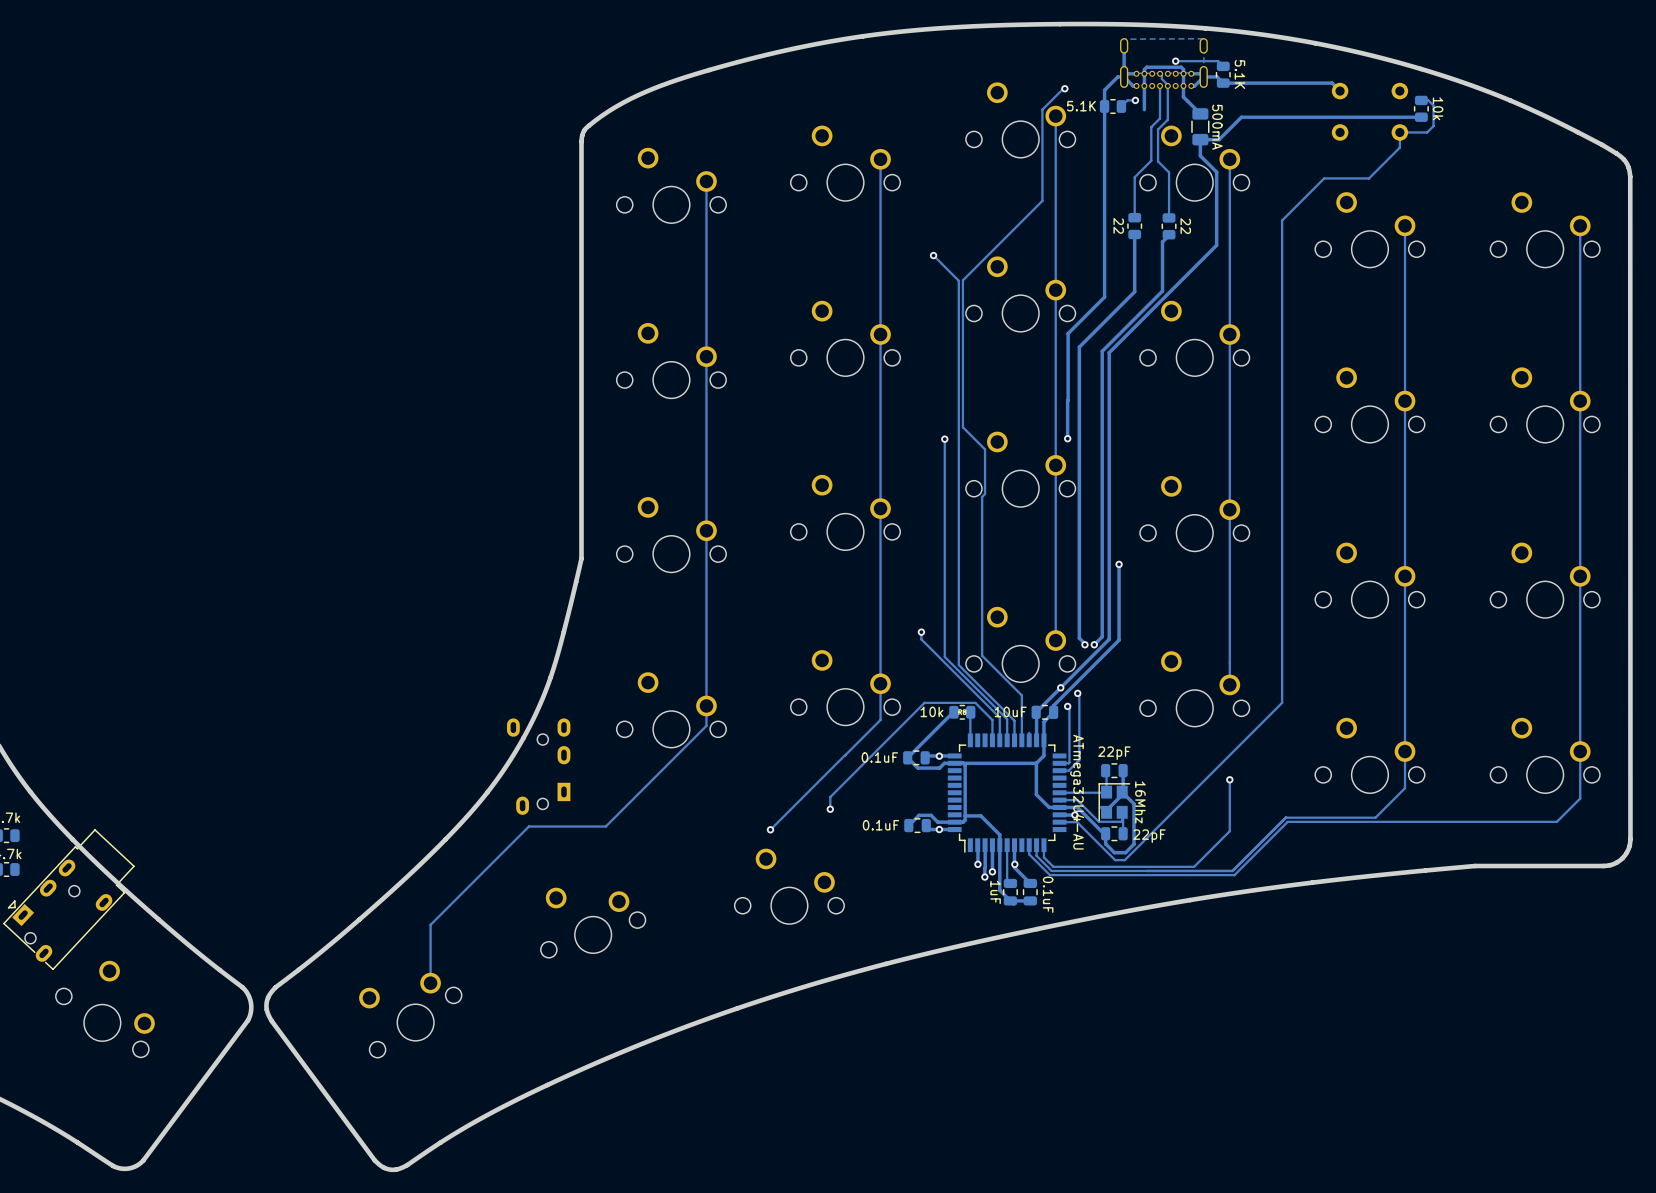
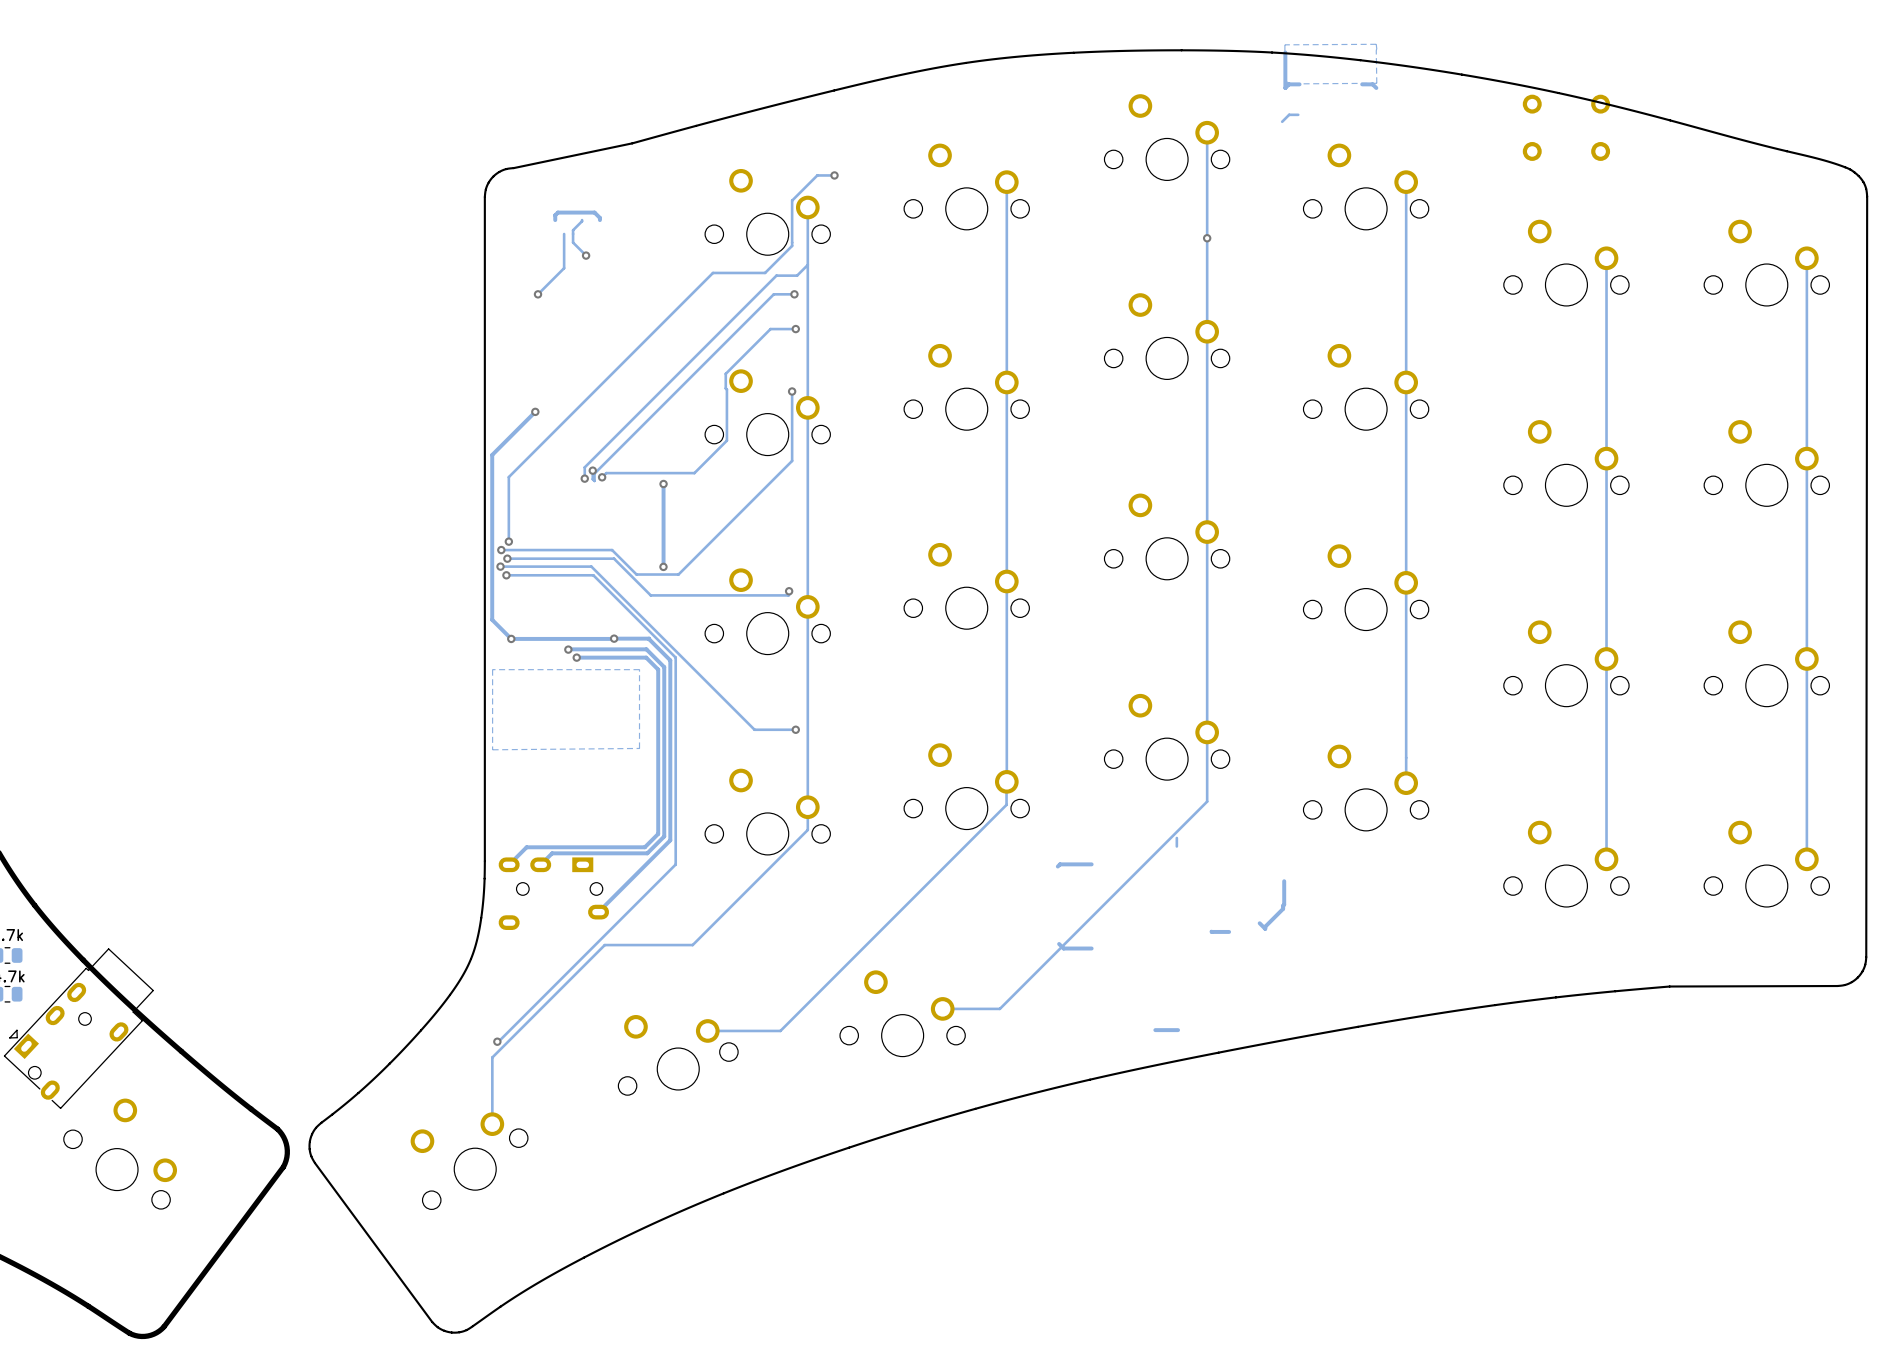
board edge: (1059, 24) (985, 25) (912, 30) (853, 37) (786, 50) (709, 70) (653, 88) (616, 106) (584, 130) (581, 141) (581, 558) (560, 643) (547, 685) (533, 719) (515, 752) (495, 782) (469, 813) (435, 849) (387, 895) (325, 948) (275, 987) (266, 1002) (267, 1011) (271, 1021) (374, 1160) (383, 1167) (393, 1169) (403, 1167) (453, 1134) (499, 1108) (570, 1074) (641, 1044) (764, 999) (895, 961) (1075, 921) (1235, 892) (1347, 878) (1475, 866) (1606, 865) (1618, 861) (1626, 852) (1630, 839) (1630, 176) (1625, 161) (1602, 144) (1510, 100) (1443, 76) (1368, 54) (1294, 39) (1226, 30) (1150, 25) (1059, 24) -> (1181, 50) (1260, 51) (1332, 57) (1417, 67) (1510, 83) (1614, 106) (1823, 160) (1849, 169) (1861, 179) (1867, 196) (1866, 957) (1862, 971) (1852, 981) (1839, 985) (1669, 986) (1563, 996) (1469, 1008) (1236, 1049) (1039, 1091) (880, 1137) (731, 1190) (653, 1223) (578, 1260) (520, 1293) (466, 1330) (453, 1332) (440, 1328) (432, 1322) (314, 1163) (310, 1154) (309, 1144) (311, 1135) (316, 1126) (382, 1071) (441, 1006) (467, 966) (479, 928) (484, 869) (484, 197) (488, 182) (496, 174) (506, 169) (632, 143) (799, 99) (924, 70) (979, 61) (1039, 54) (1181, 50)
track: (1175, 61) (1218, 61) (1223, 66) -> none
via: (1175, 61) -> none
part: (1163, 63) -> none
track: (1160, 73) (1161, 79) (1167, 84) (1167, 119) (1158, 129) (1158, 161) (1169, 172) (1169, 217) -> none
part: 5.1K (1223, 74) -> none
track: (1136, 85) (1133, 85) (1124, 76) (1117, 76) (1104, 90) (1104, 297) (1068, 333) (1067, 438) -> none
track: (1160, 85) (1160, 118) (1151, 127) (1151, 160) (1134, 177) (1134, 217) -> none
track: (1191, 85) (1194, 85) (1203, 76) (1217, 76) (1223, 83) (1332, 83) (1340, 91) -> none
track: (1064, 88) (1042, 109) (1042, 200) (962, 280) (962, 427) (985, 449) (985, 494) (982, 496) (982, 655) (1021, 695) (1021, 740) -> none
via: (1064, 88) -> none
via: (1135, 100) -> none
track: (1421, 100) (1428, 100) (1433, 105) (1433, 126) (1427, 132) (1399, 132) (1399, 147) (1369, 178) (1324, 178) (1282, 220) (1282, 702) (1124, 860) (1115, 860) (1077, 822) (1059, 822) -> none
part: 5.1K (1112, 106) -> none
part: 10k (1421, 108) -> none
track: (1144, 109) (1144, 69) (1146, 67) (1181, 67) (1183, 69) (1183, 97) (1200, 113) -> none
track: (1421, 117) (1241, 117) (1219, 139) (1200, 139) (1200, 155) (1216, 172) (1216, 245) (1109, 352) (1109, 639) (1036, 712) -> none
part: 500mA (1200, 126) -> none
track: none -> (834, 175) (817, 175) (792, 200) (792, 245) (765, 272) (712, 272) (508, 477) (508, 541)
via: none -> (834, 175)
track: none -> (582, 220) (573, 230) (573, 242) (586, 255)
track: none -> (599, 220) (594, 212) (557, 212) (555, 215) (555, 220)
track: none -> (564, 234) (564, 268) (538, 294)
via: none -> (1207, 238)
via: none -> (586, 255)
part: 22 (1134, 226) -> none
part: 22 (1169, 226) -> none
track: none -> (807, 264) (797, 275) (776, 275) (584, 467) (584, 478)
track: (1134, 234) (1134, 291) (1079, 347) (1079, 638) (1083, 642) -> none
track: (1169, 234) (1162, 241) (1162, 291) (1102, 351) (1102, 636) (1094, 644) -> none
track: (933, 255) (958, 280) (958, 665) (1014, 720) (1014, 740) -> none
via: (933, 255) -> none
via: none -> (538, 294)
track: none -> (794, 294) (773, 294) (594, 473) (594, 480) (592, 470)
via: none -> (794, 294)
track: none -> (795, 329) (770, 329) (725, 373) (726, 440) (694, 473) (606, 473) (602, 477)
via: none -> (795, 329)
via: none -> (792, 391)
track: none -> (794, 391) (792, 391) (792, 460) (678, 574) (636, 574) (612, 550) (501, 550)
track: none -> (535, 411) (492, 454) (492, 619) (511, 638) (615, 638)
via: none -> (535, 411)
via: none -> (592, 470)
via: none -> (602, 477)
via: none -> (584, 478)
track: none -> (663, 483) (663, 566)
via: none -> (663, 483)
via: (1067, 438) -> none
track: (944, 439) (944, 656) (1007, 719) (1007, 740) -> none
via: (944, 439) -> none
via: none -> (508, 541)
via: none -> (501, 550)
track: none -> (507, 558) (614, 558) (650, 595) (788, 595) (789, 591)
via: none -> (507, 558)
track: none -> (500, 566) (591, 566) (754, 729) (795, 729)
via: none -> (500, 566)
via: none -> (663, 566)
track: none -> (506, 575) (593, 575) (675, 657) (675, 864) (497, 1041)
via: none -> (506, 575)
via: none -> (789, 591)
via: none -> (511, 638)
track: none -> (614, 638) (649, 638) (670, 660) (670, 840) (598, 912)
via: none -> (614, 638)
track: (1119, 564) (1119, 640) (1053, 705) (1053, 712) (1043, 721) (1043, 755) (1036, 763) -> none
via: (1119, 564) -> none
track: none -> (568, 649) (646, 649) (664, 667) (664, 836) (647, 853) (552, 853) (540, 864)
via: none -> (568, 649)
track: none -> (576, 657) (646, 657) (658, 669) (658, 833) (644, 847) (526, 847) (509, 864)
via: none -> (576, 657)
zone outline: none -> (639, 669) (639, 748) (492, 749) (492, 669) (639, 669)
track: (921, 632) (921, 639) (999, 717) (999, 740) -> none
via: (921, 632) -> none
via: none -> (795, 729)
track: none -> (1207, 732) (1207, 801) (999, 1008) (942, 1008)
via: (1084, 644) -> none
via: (1094, 644) -> none
track: (880, 683) (880, 719) (845, 755) -> (1006, 782) (1006, 804) (780, 1030) (708, 1030)
via: (1060, 687) -> none
track: (1077, 693) (1079, 694) (1079, 760) (1068, 770) (1059, 770) -> none
via: (1077, 693) -> none
track: (1067, 706) (1069, 708) (1069, 762) (1059, 763) -> none
via: (1067, 706) -> none
track: (953, 712) (907, 757) (917, 768) (939, 768) (944, 763) (1036, 763) -> none
part: 10k (962, 712) -> none
track: (970, 712) (970, 740) -> none
track: (1036, 712) (1036, 740) -> none
part: 10uF (1044, 712) -> none
track: (992, 740) (992, 719) (975, 702) (924, 702) (830, 797) (830, 809) -> none
track: (1405, 751) (1405, 788) (1375, 817) (1285, 817) (1232, 870) -> none
track: (1580, 751) (1580, 798) (1556, 821) (1287, 821) (1234, 875) (1049, 875) (1029, 854) (1029, 845) (1027, 846) -> none
track: (845, 755) (770, 829) -> none
via: (939, 756) -> none
part: 0.1uF (916, 757) -> none
track: (963, 763) (965, 765) (965, 820) (963, 822) (937, 822) (931, 815) (919, 815) (908, 825) -> none
track: (1036, 763) (1036, 794) (1049, 807) (1077, 807) (1105, 833) (1105, 843) (1114, 852) (1125, 852) (1134, 844) (1134, 803) (1122, 792) -> none
part rotation: 0° (538, 766) -> 90° counterclockwise (553, 893)
track: (1105, 770) (1105, 792) (1059, 792) -> none
part: 22pF (1114, 770) -> none
track: (1229, 779) (1229, 831) (1194, 866) (1053, 866) (1043, 857) (1043, 845) -> none
via: (1229, 779) -> none
part: ATmega32U4-AU (1007, 793) -> none
track: (1061, 801) (1059, 800) (1077, 800) (1098, 821) (1121, 821) (1122, 812) (1123, 833) -> none
part: 16Mhz (1114, 802) -> none
via: (830, 809) -> none
track: (965, 815) (980, 815) (999, 834) (999, 890) (1013, 903) -> none
via: (1074, 815) -> none
track: (1286, 817) (1232, 870) (1051, 870) (1036, 855) (1036, 845) -> none
part: 0.1uF (917, 825) -> none
via: (770, 829) -> none
via: (939, 829) -> none
part: 22pF (1114, 833) -> none
track: (977, 845) (977, 864) -> none
track: (985, 845) (984, 877) -> none
track: (992, 845) (992, 871) -> none
track: (1007, 845) (1007, 880) (1010, 883) -> none
track: (1014, 845) (1014, 867) (1030, 883) (1035, 883) -> none
via: (977, 864) -> none
via: (1014, 864) -> none
via: (992, 871) -> none
via: (984, 877) -> none
part: 1uF (1010, 892) -> none
part: 0.1uF (1030, 892) -> none
via: none -> (497, 1041)

